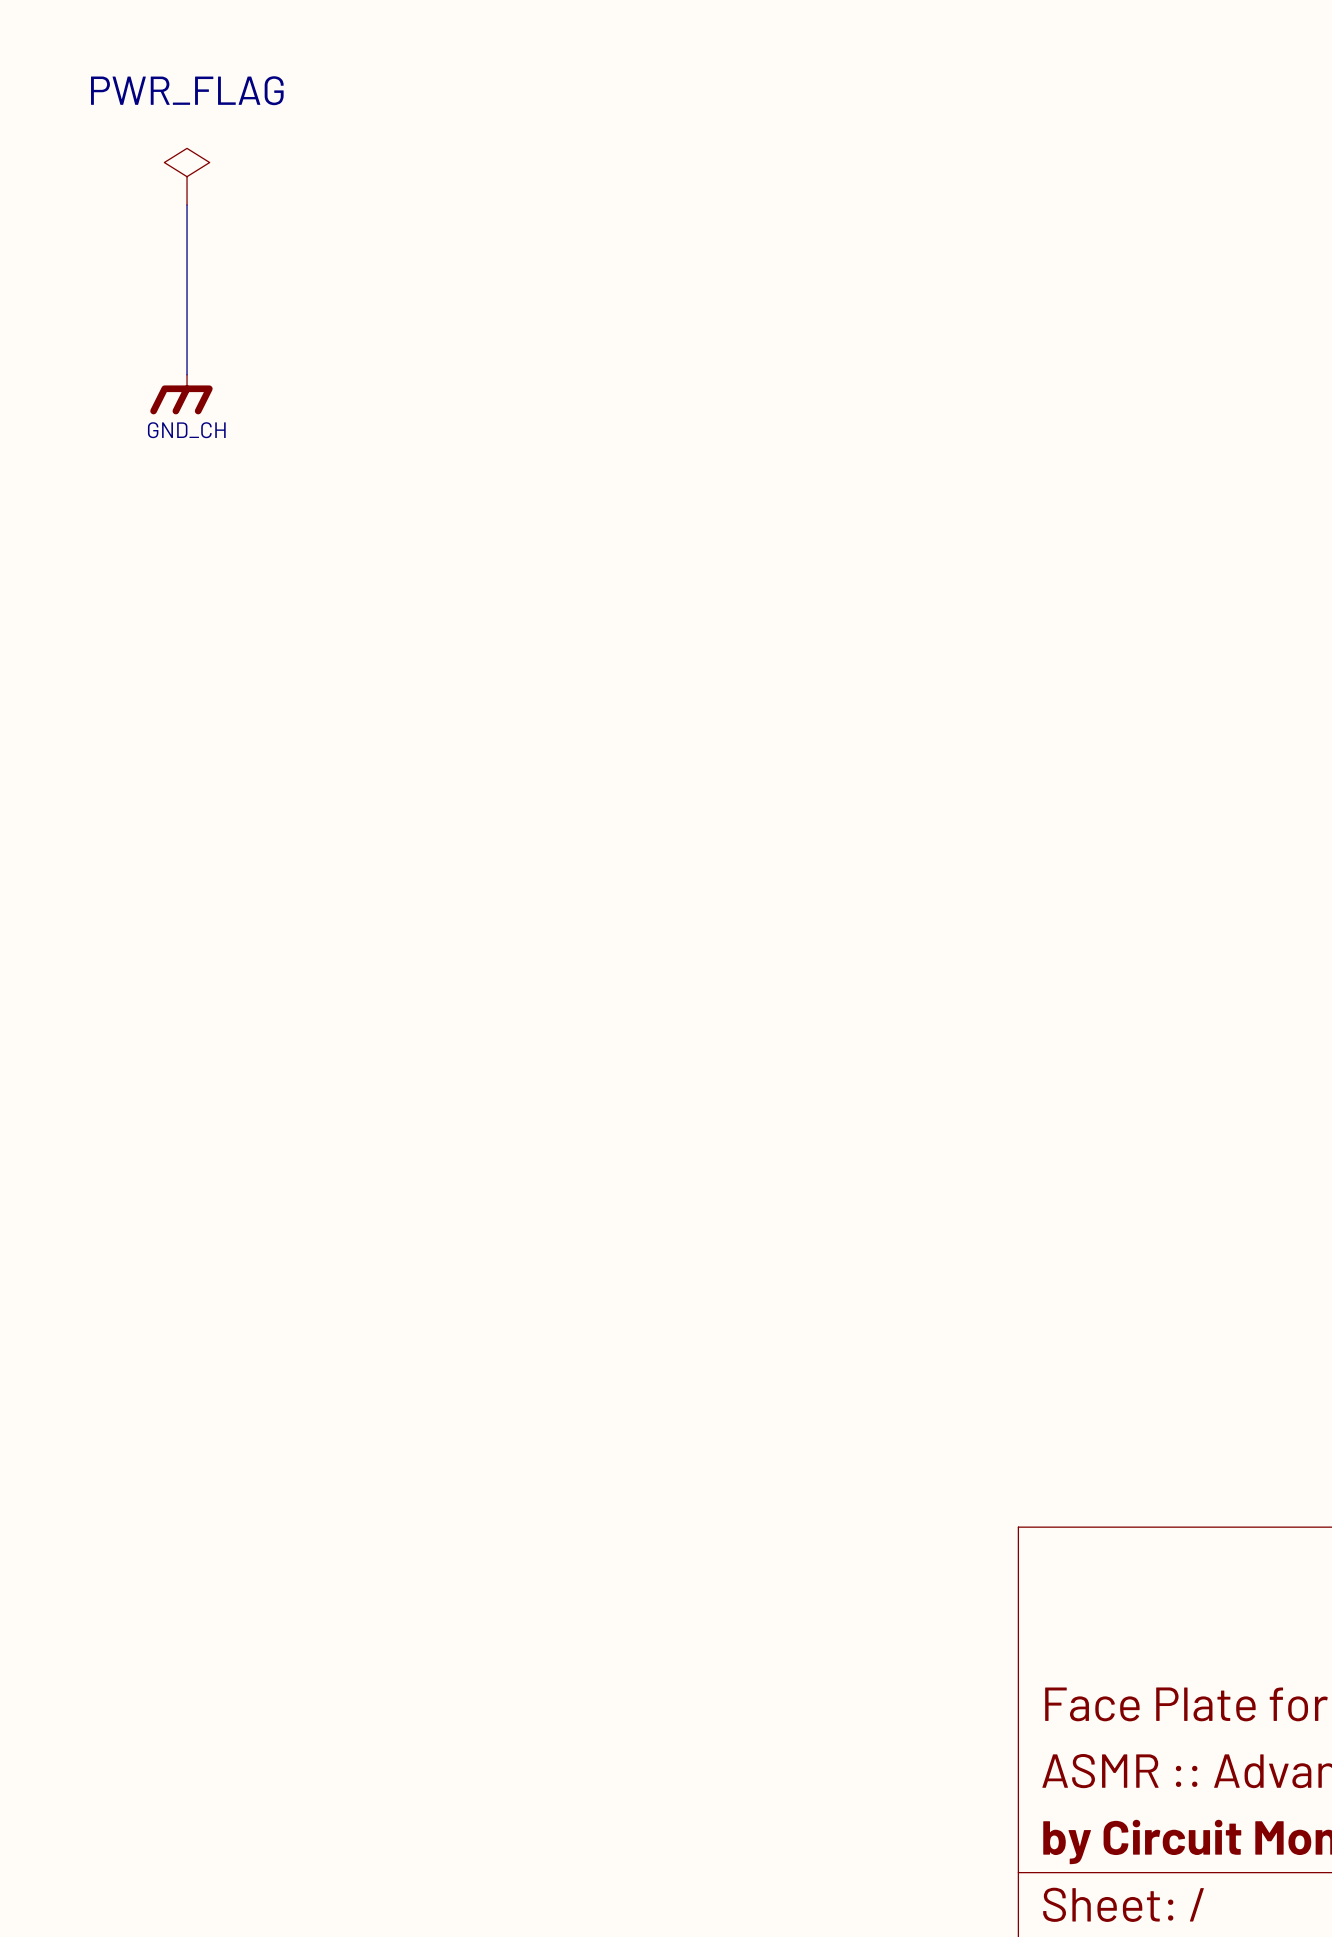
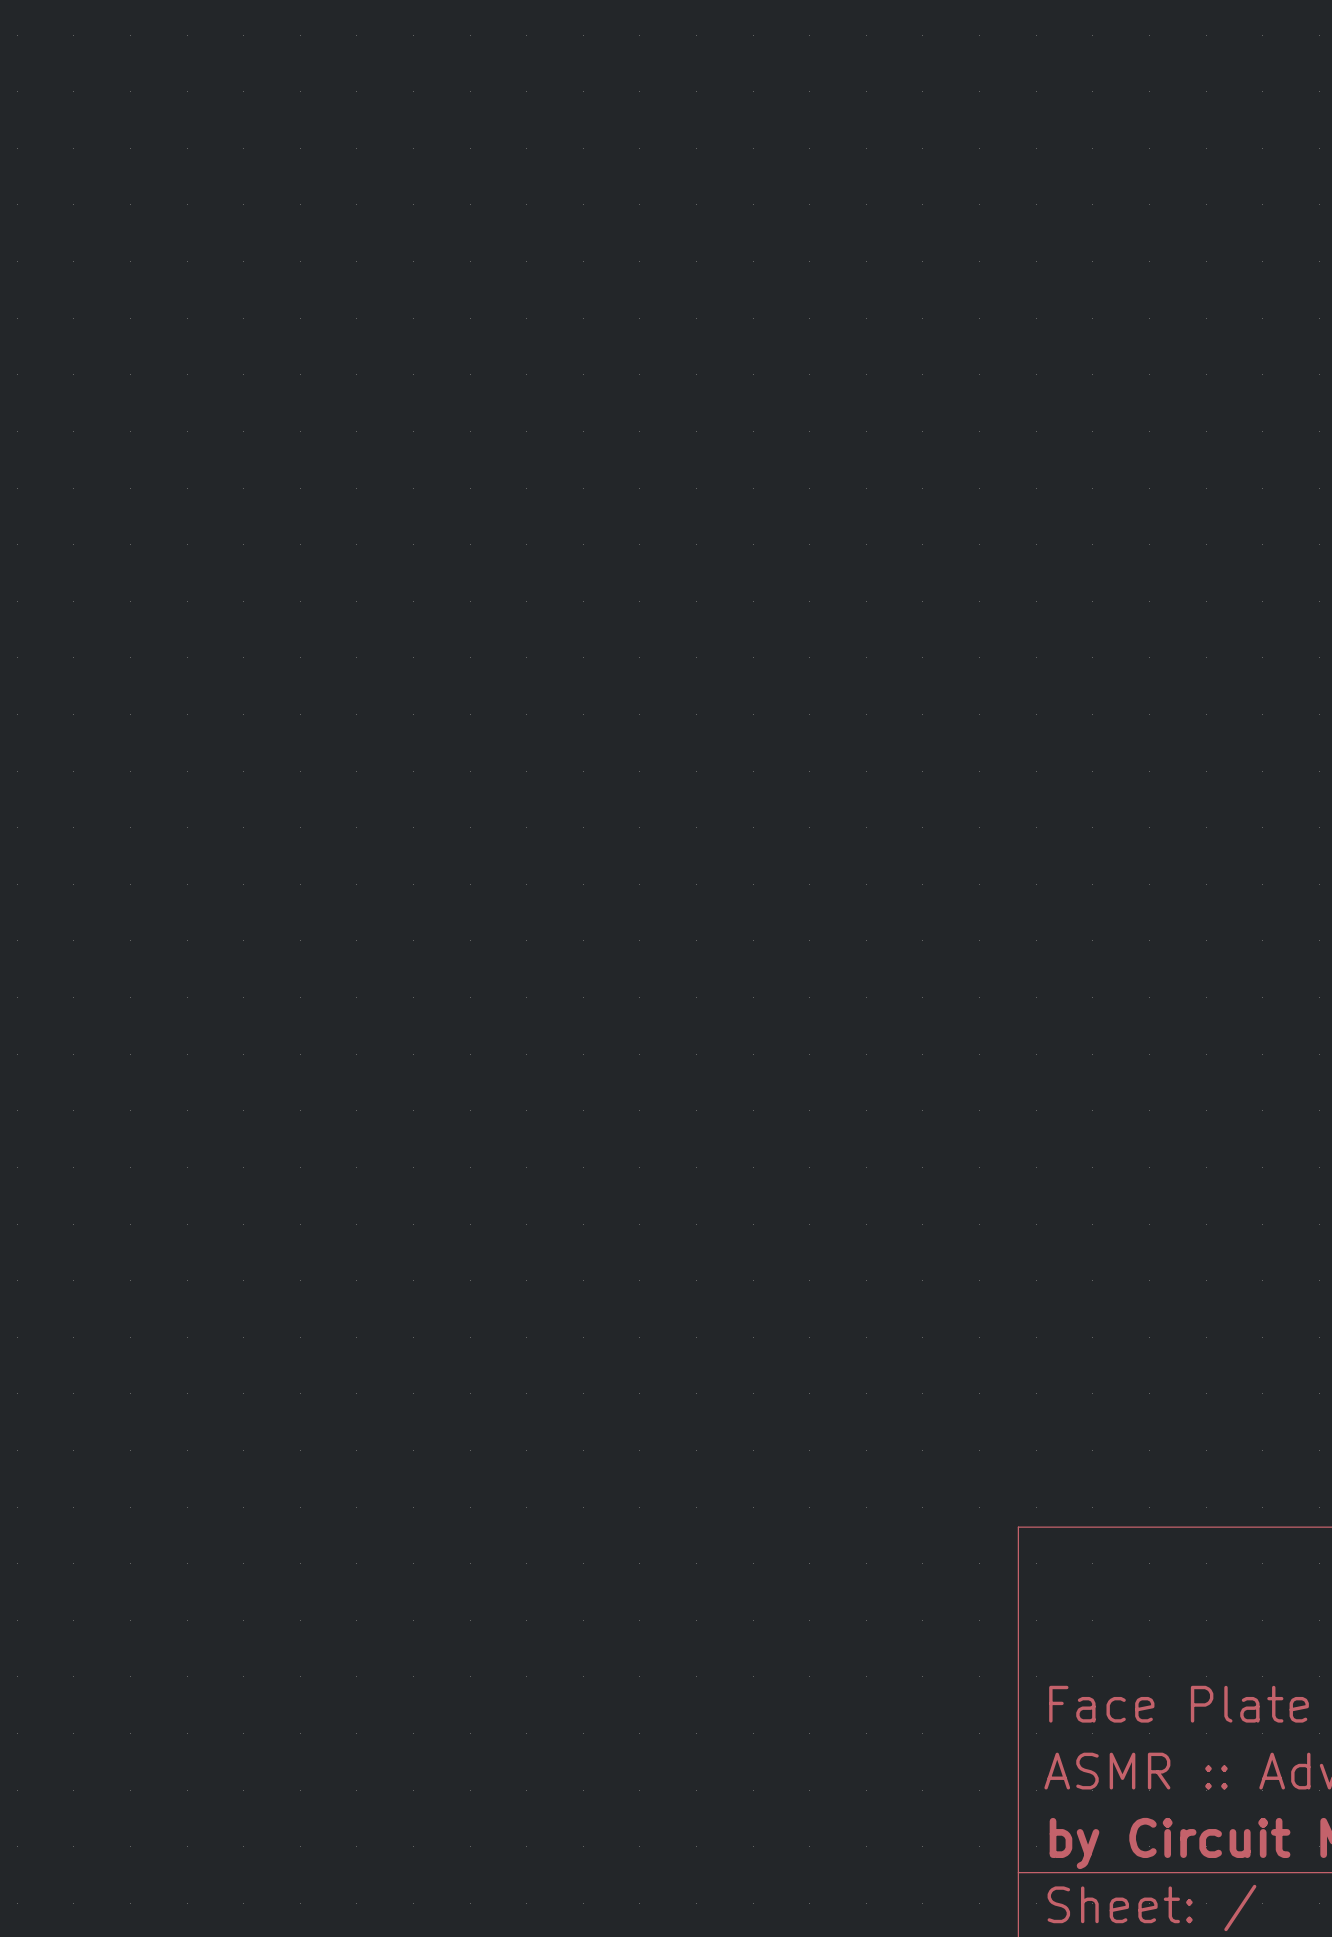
power symbol: PWR_FLAG (187, 176) -> none
wire: (187, 204) (187, 374) -> none
power symbol: GND_CH (181, 394) -> none

